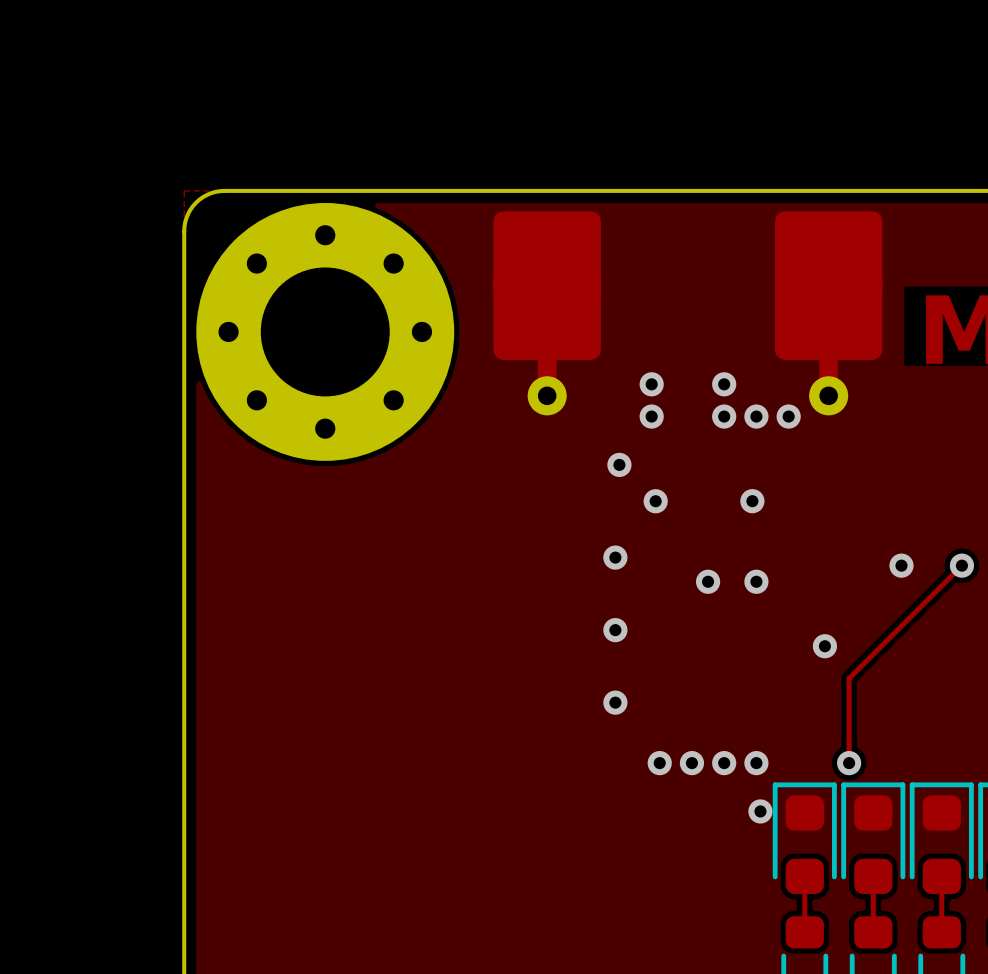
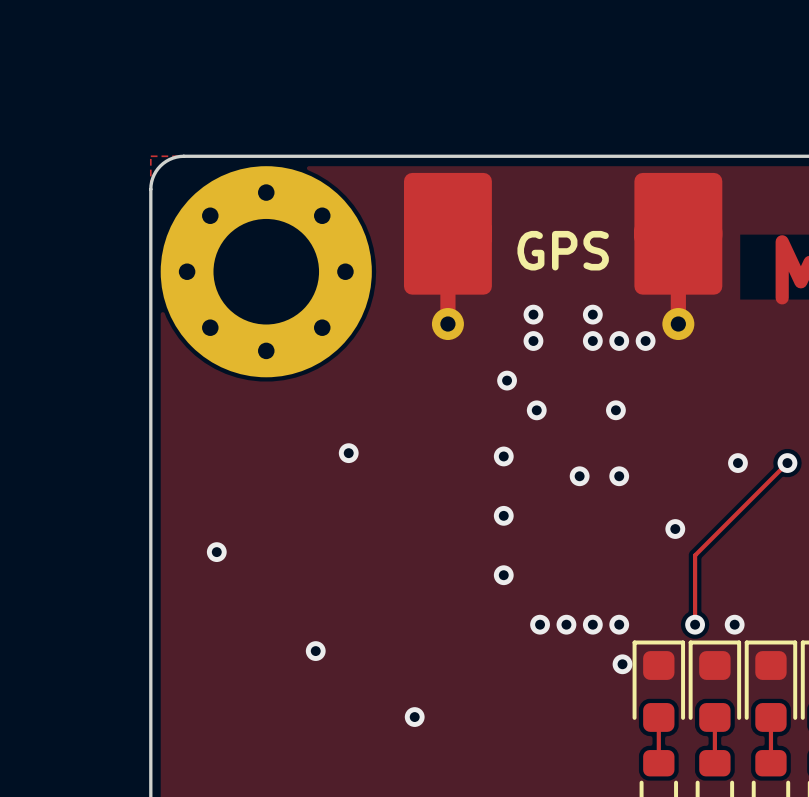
text: none -> GPS (563, 250)
via: none -> (348, 453)
via: none -> (216, 552)
via: none -> (734, 624)
via: none -> (315, 651)
via: none -> (414, 717)

